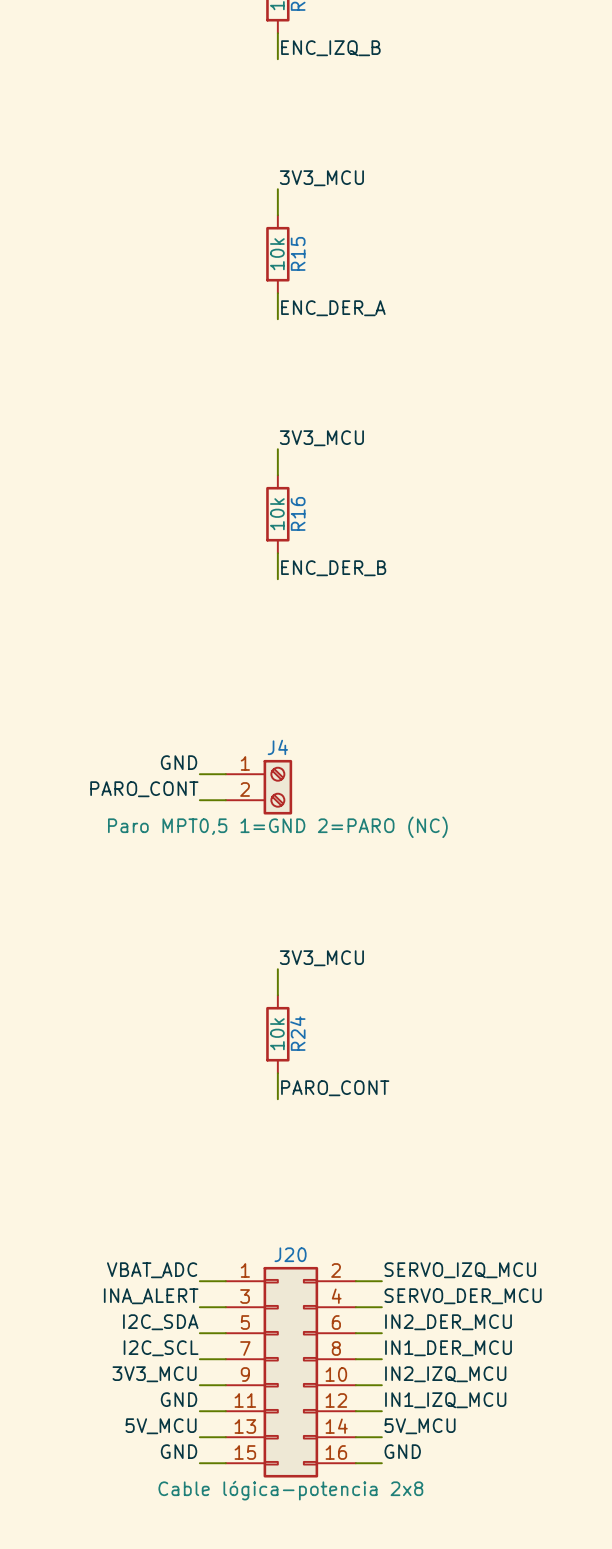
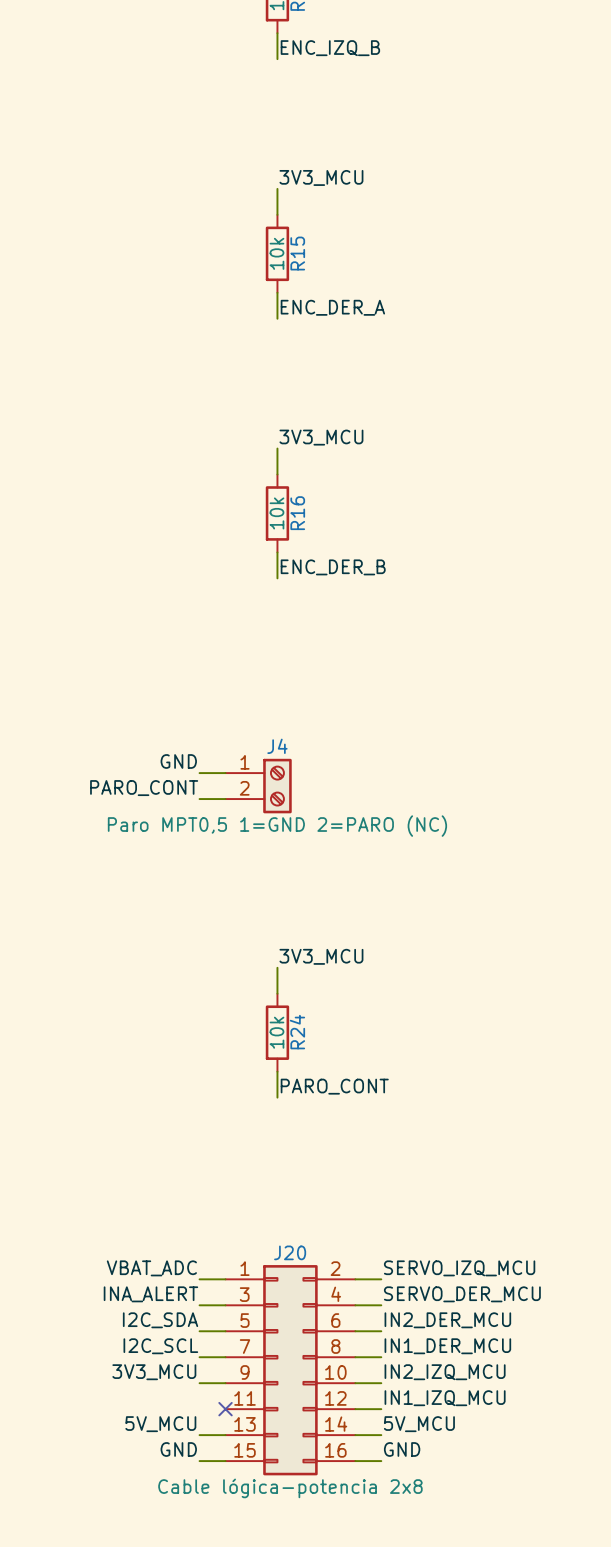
label: GND (179, 1399) -> none
wire: (199, 1411) (225, 1411) -> none
no-connect mark: none -> (225, 1409)

